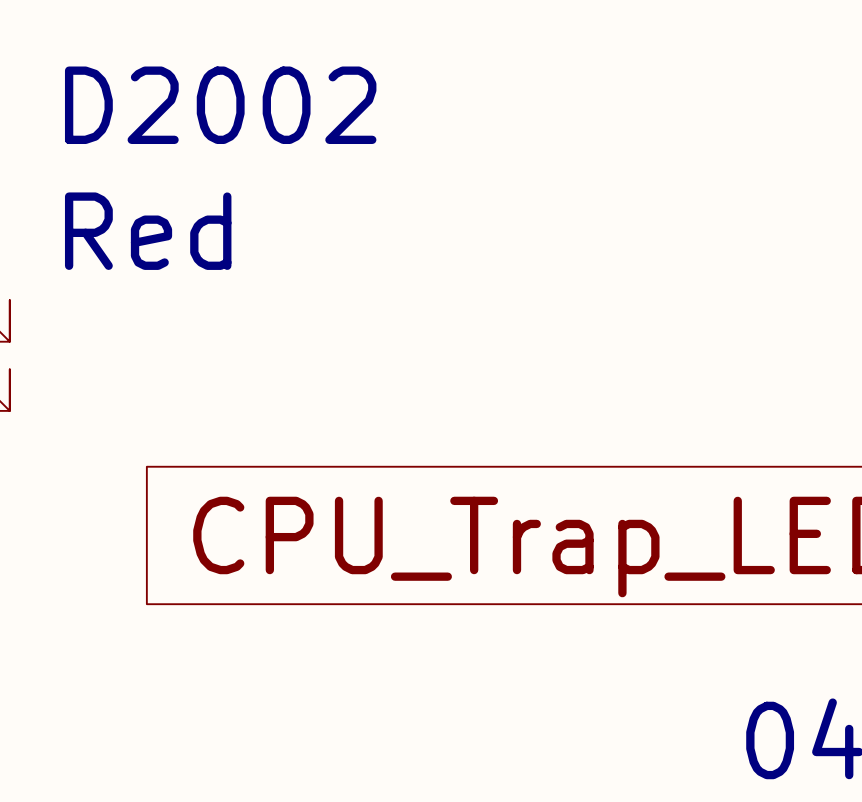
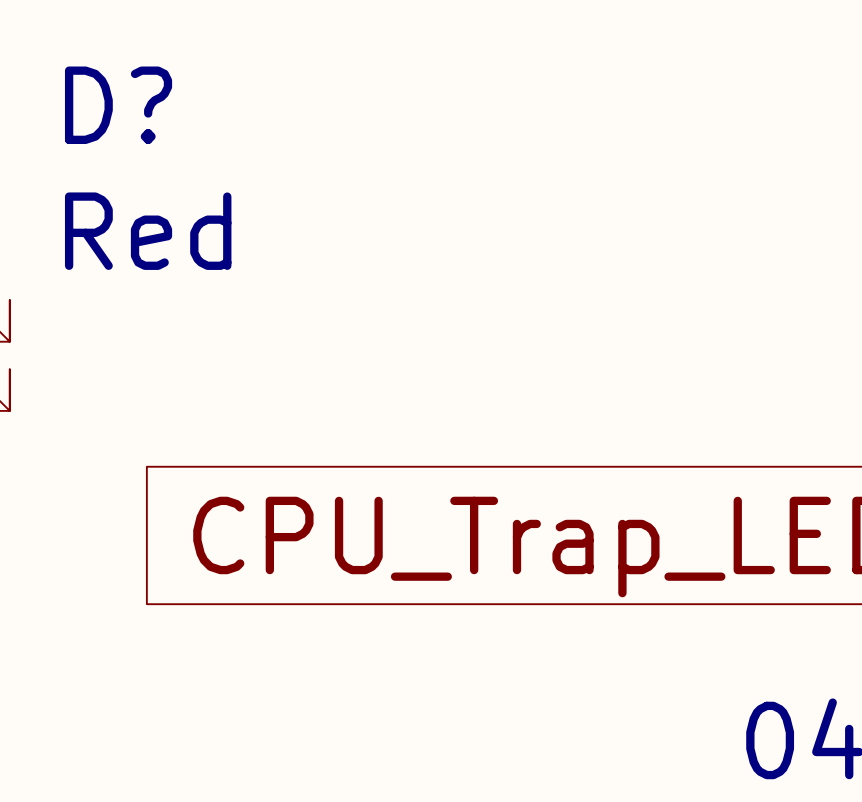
D2002 name: D2002 (220, 105) -> D? (118, 105)

